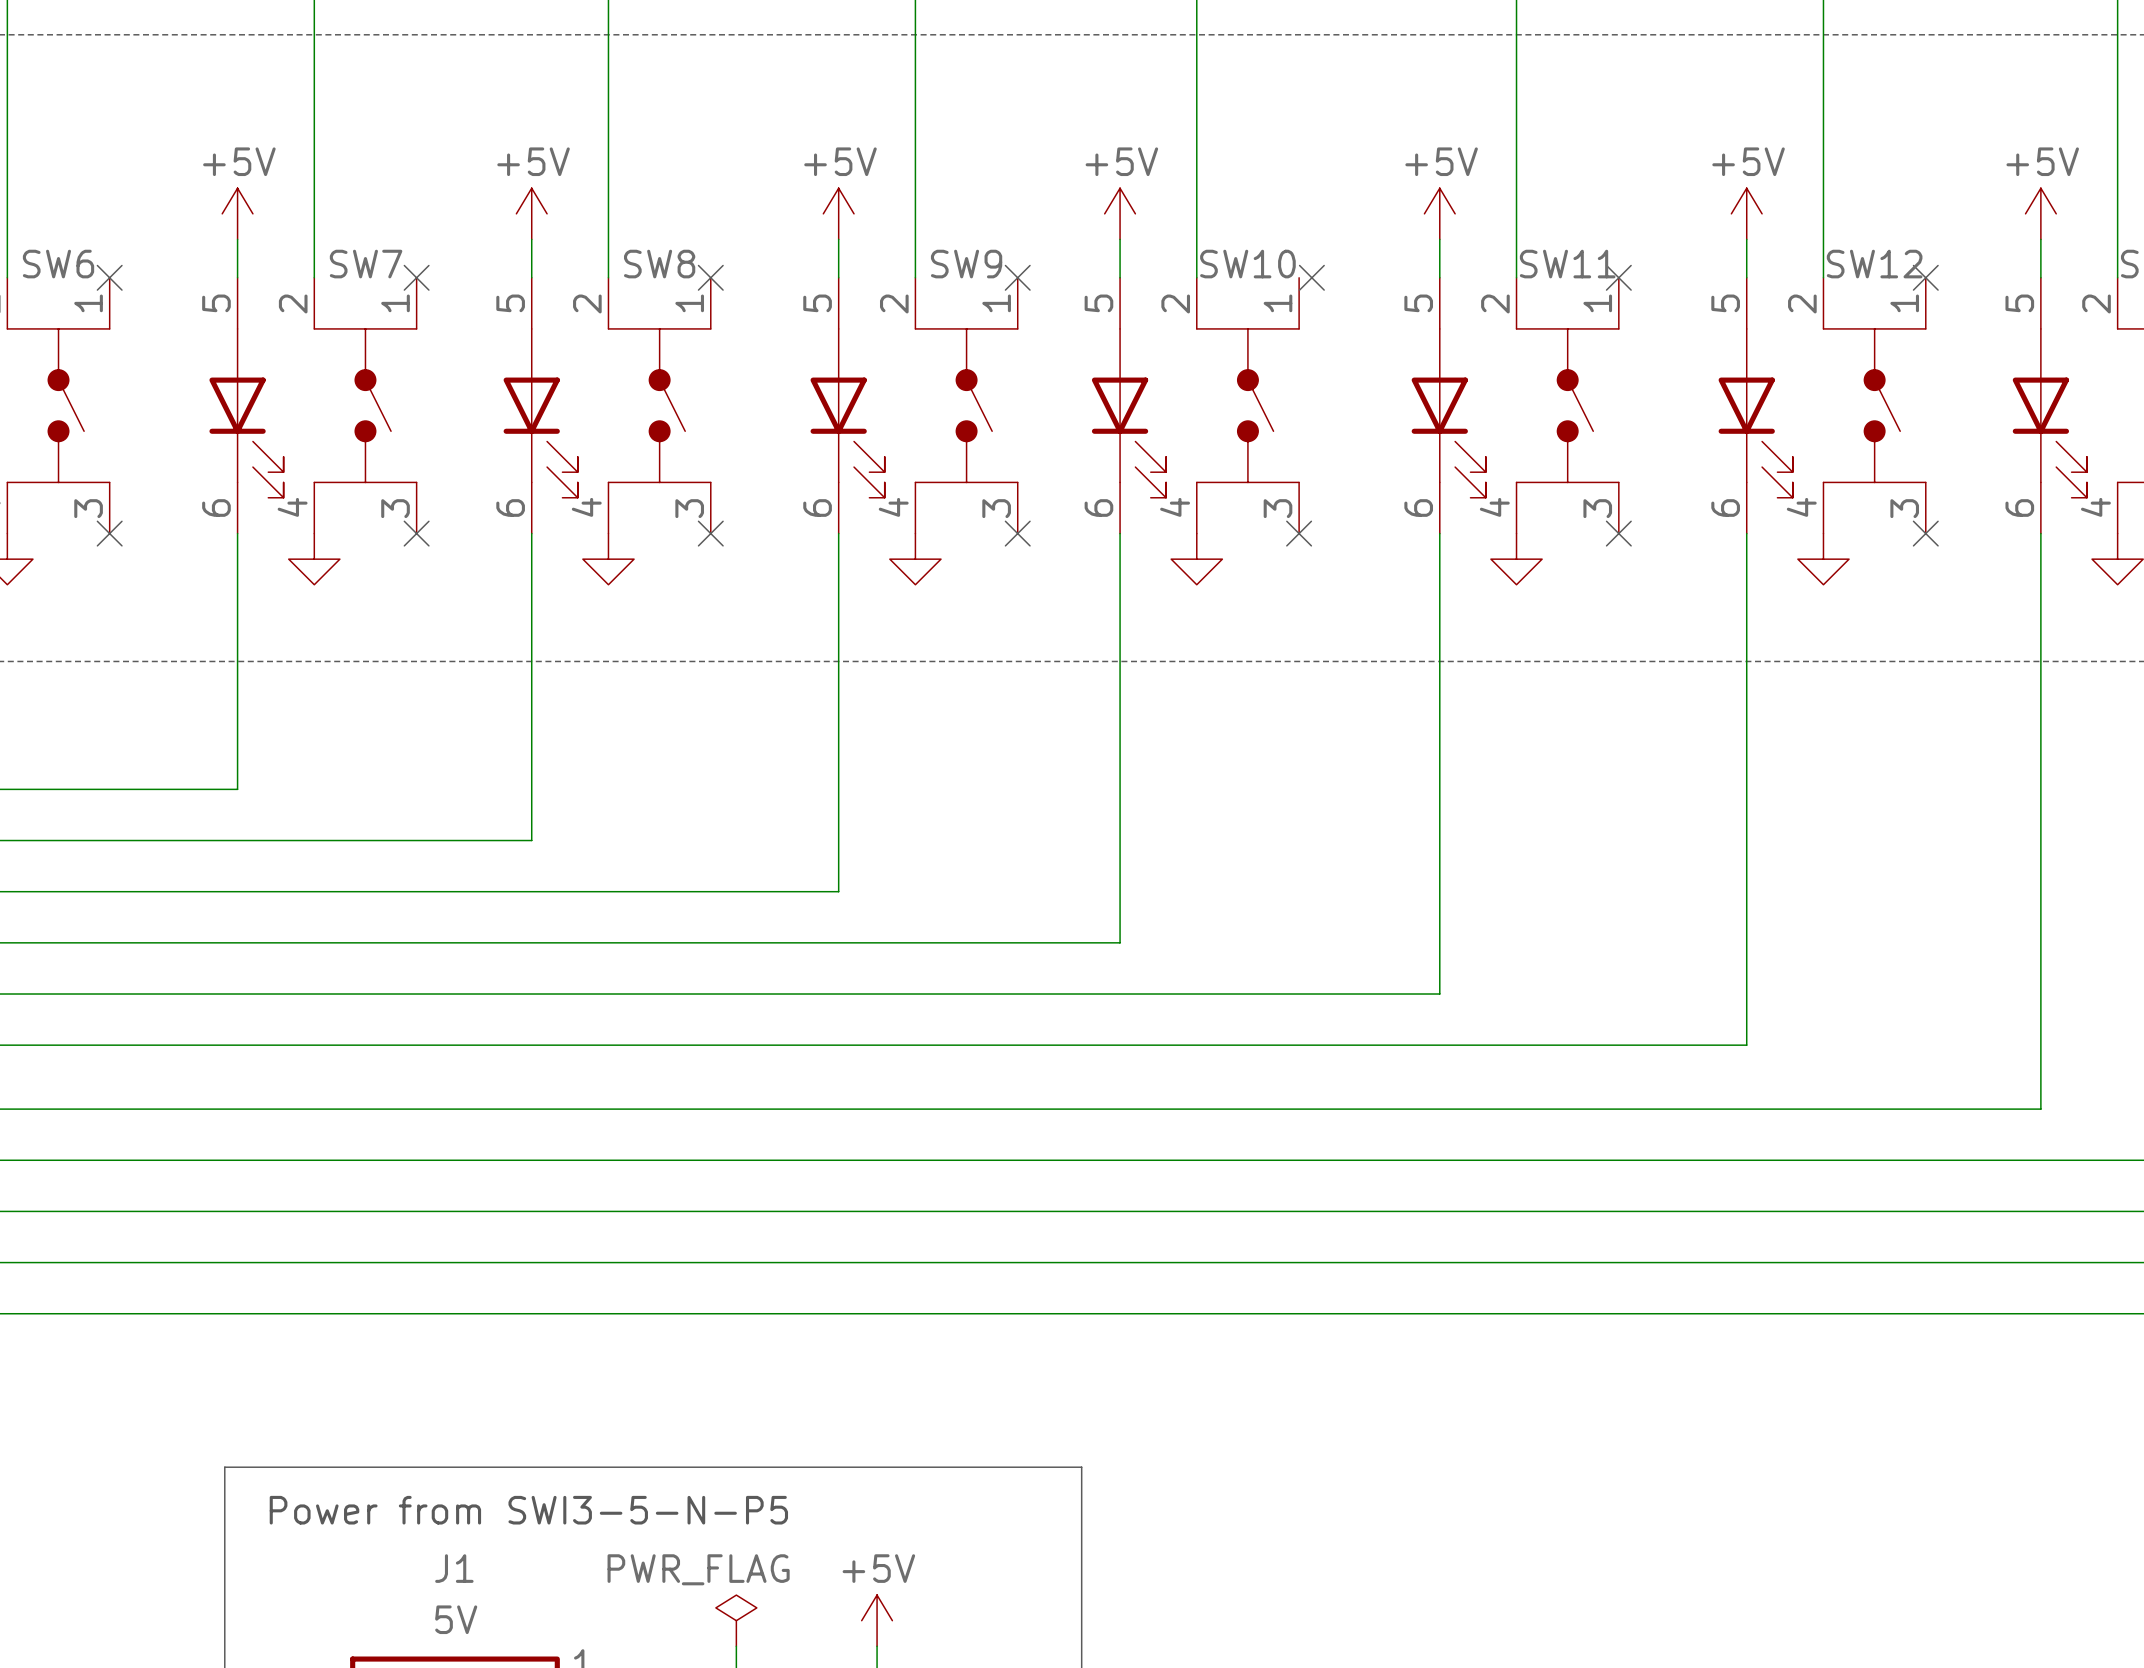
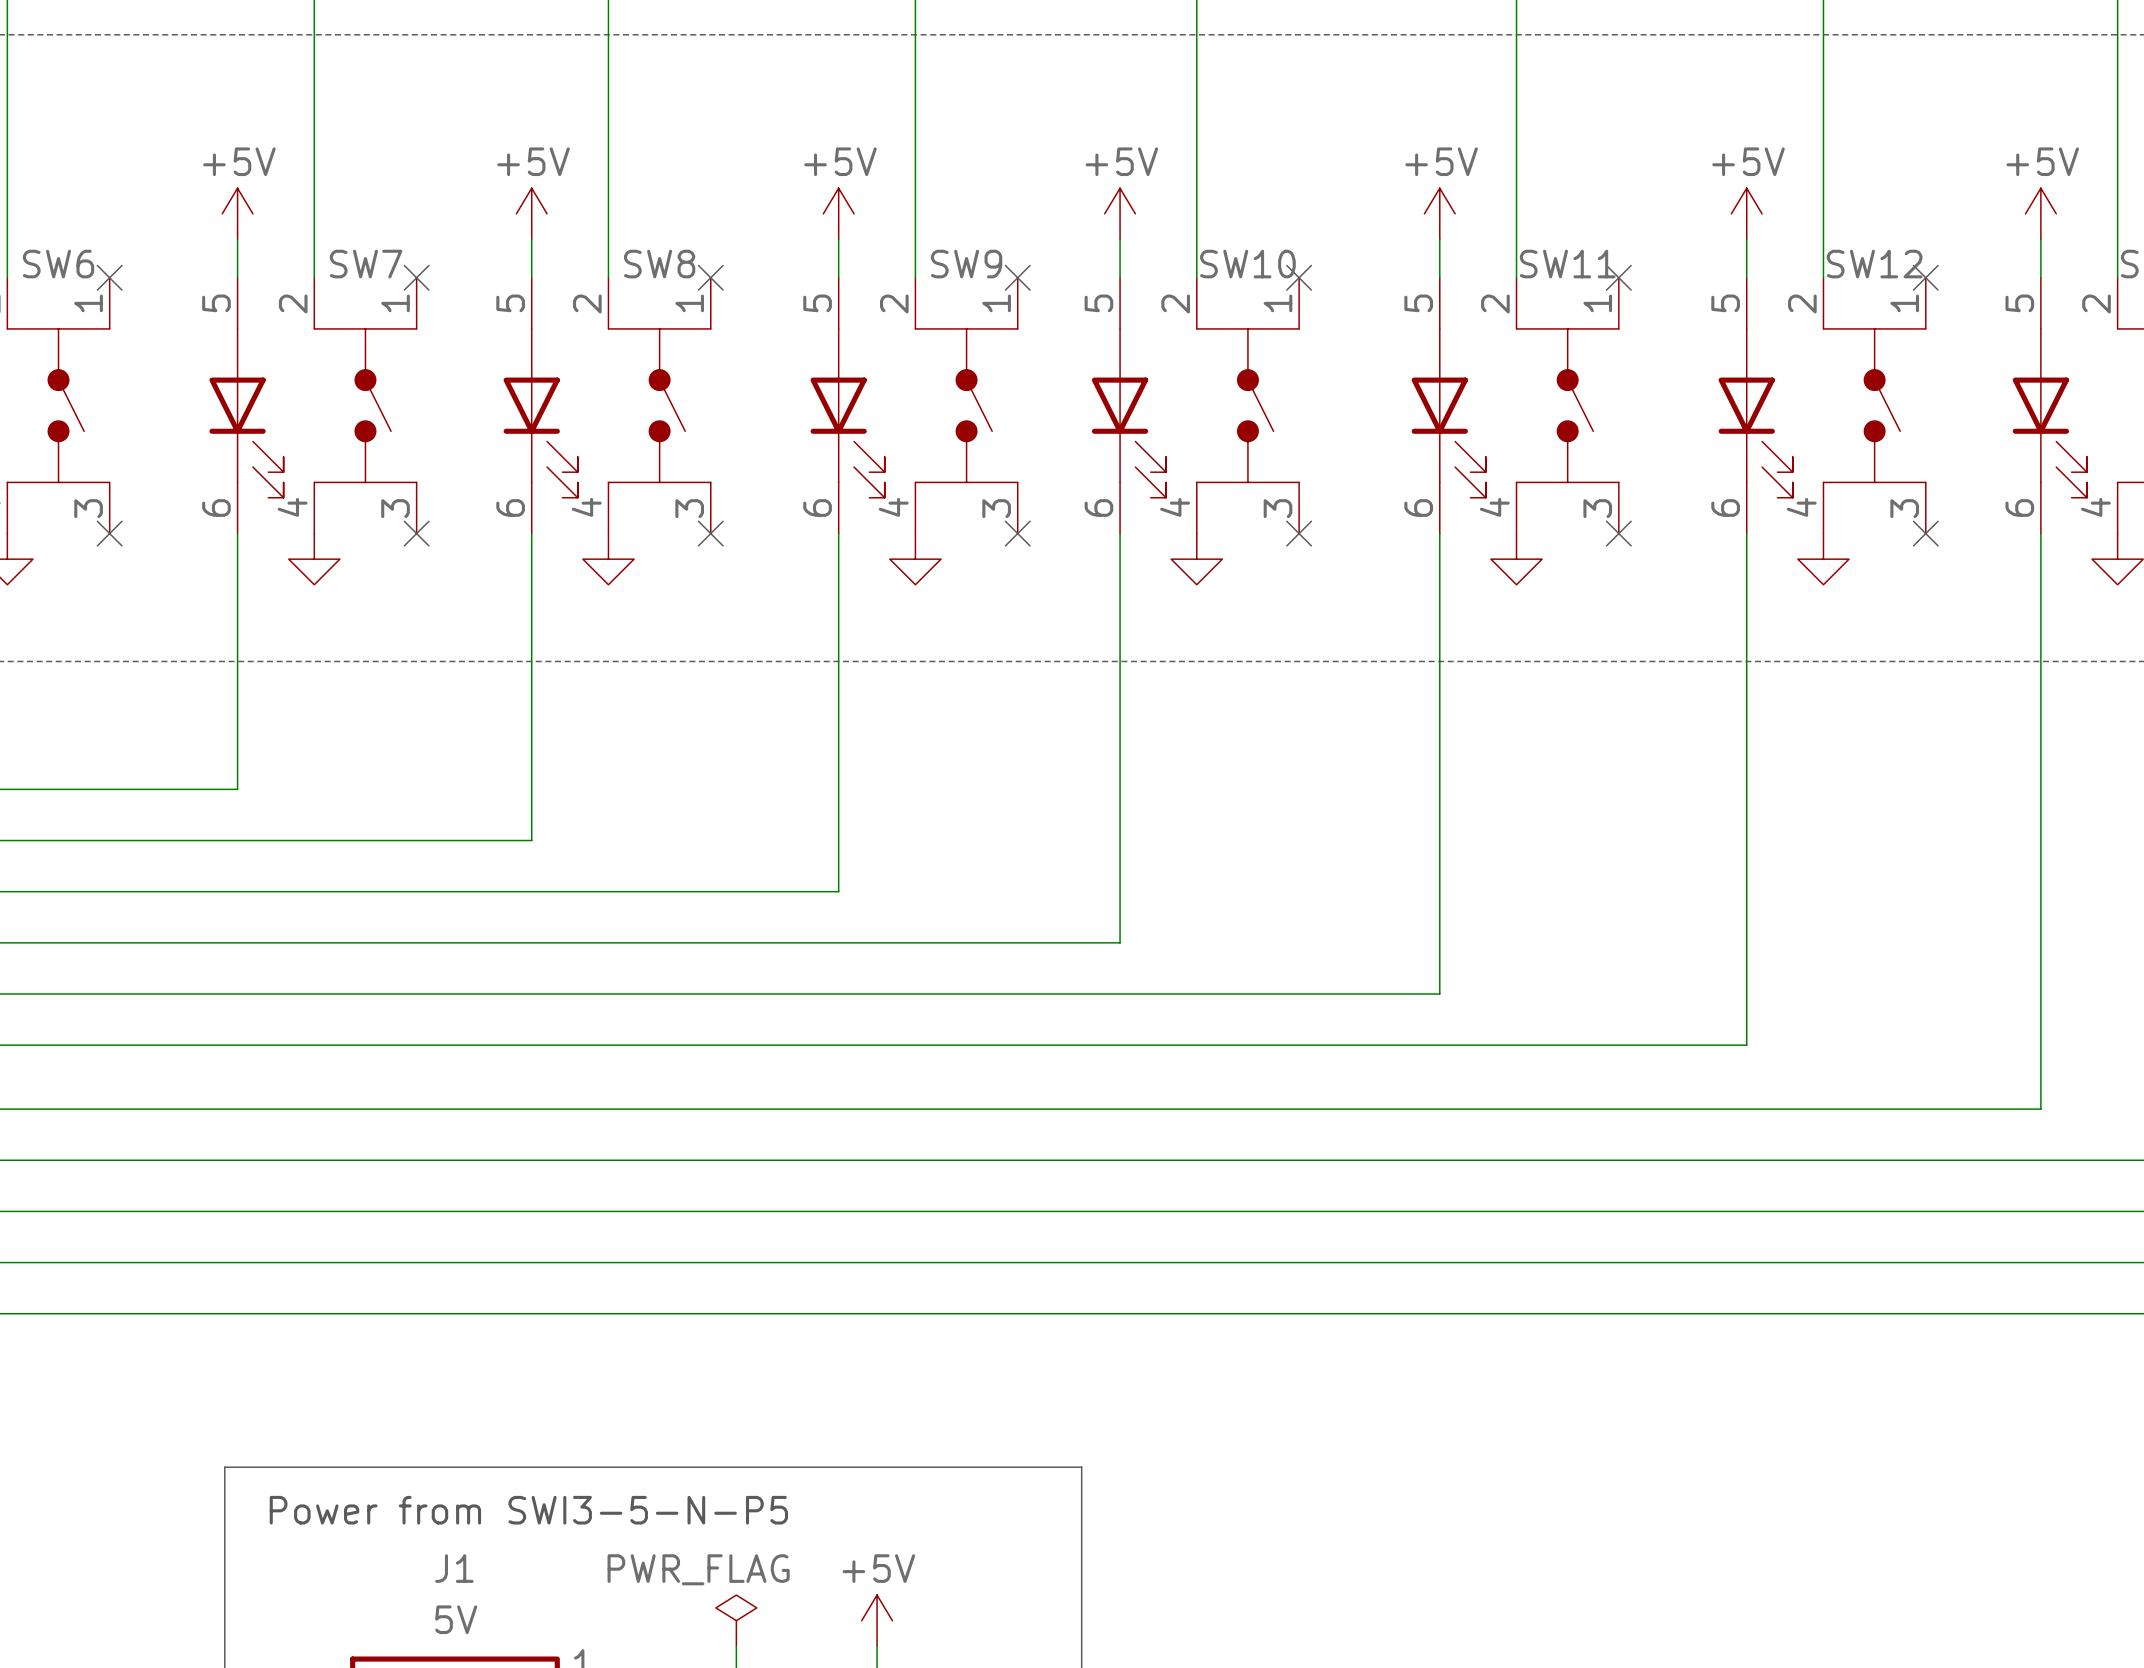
no-connect mark position: (1311, 277) -> (1299, 277)

